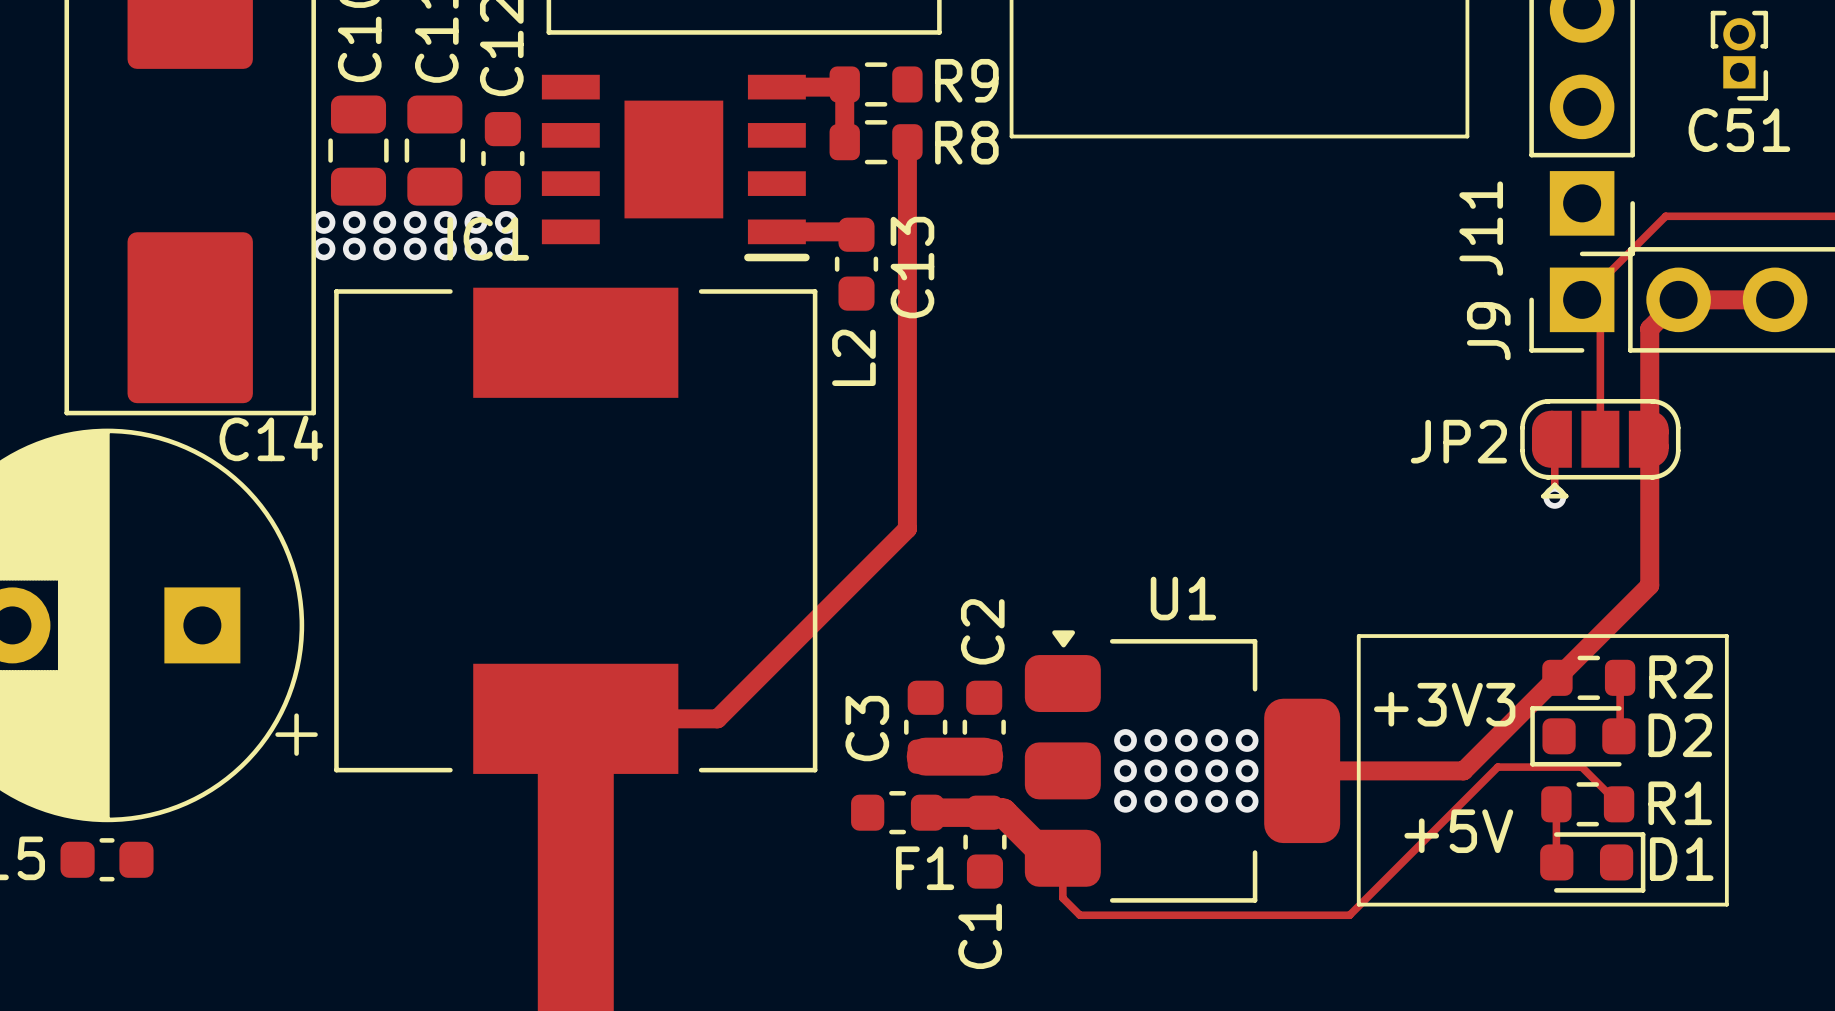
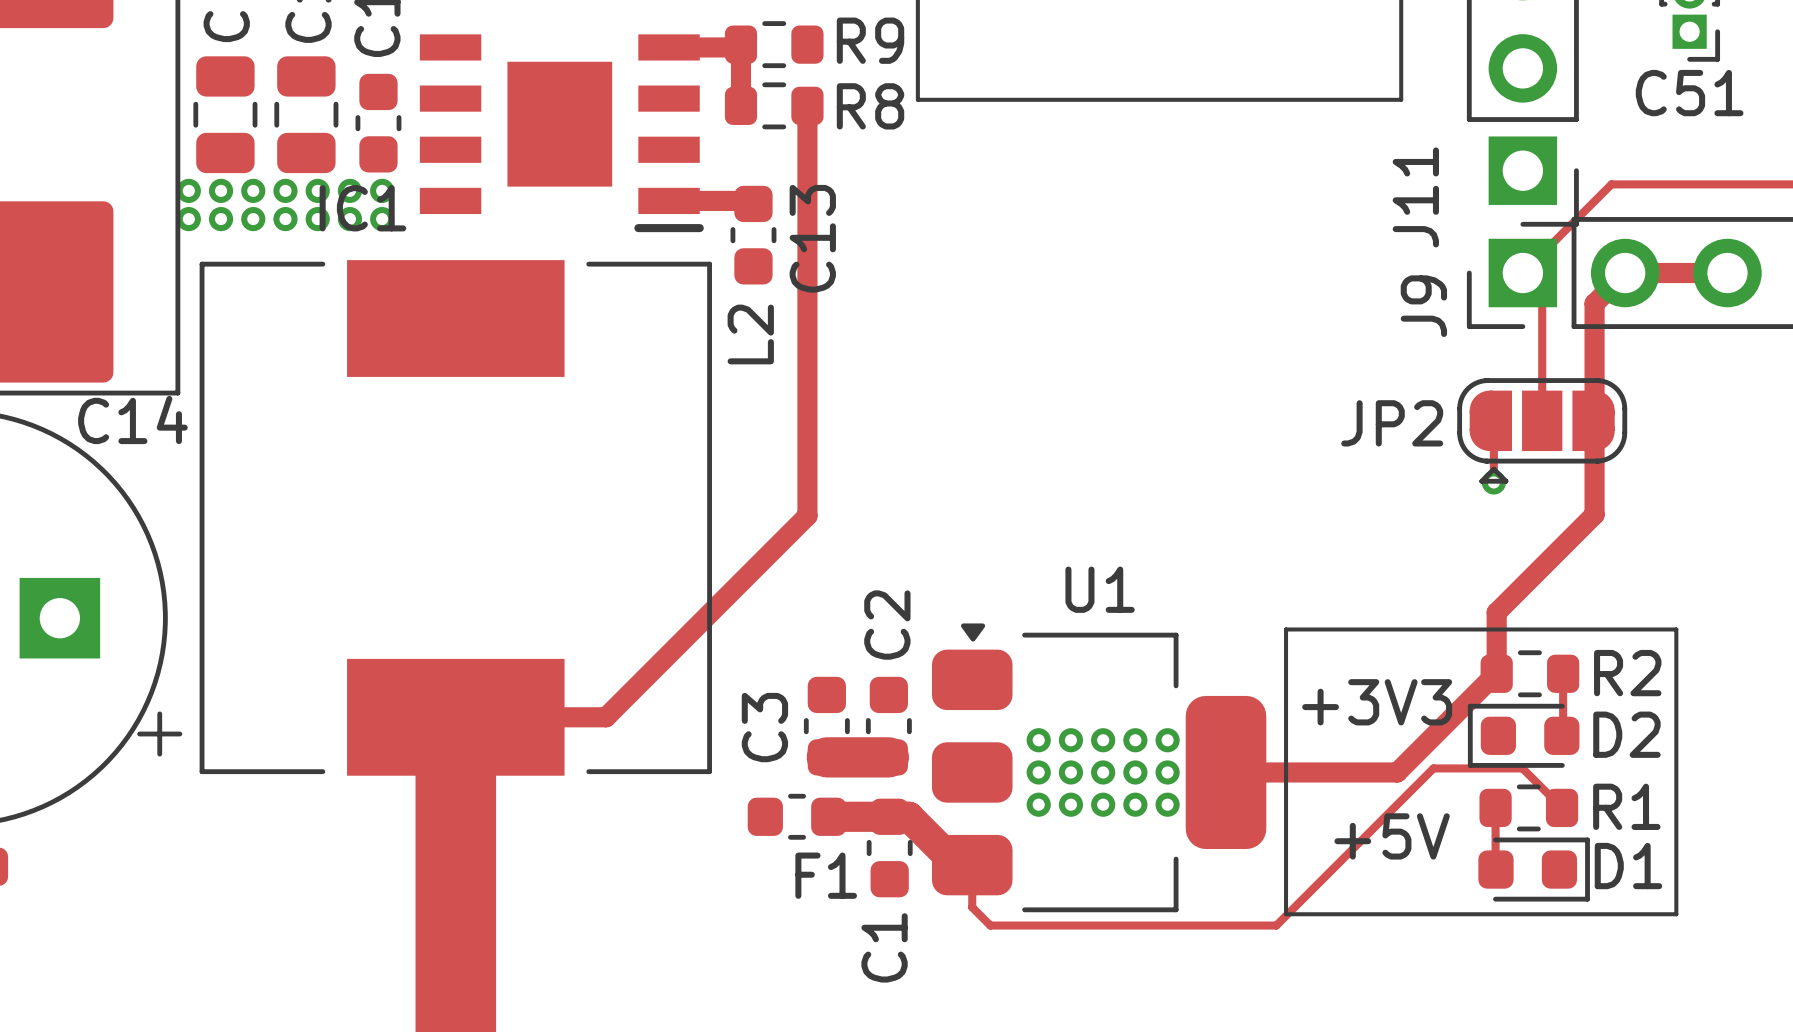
track: (1649, 527) (1649, 585) (1557, 677) -> (1594, 514) (1496, 612) (1496, 673)

